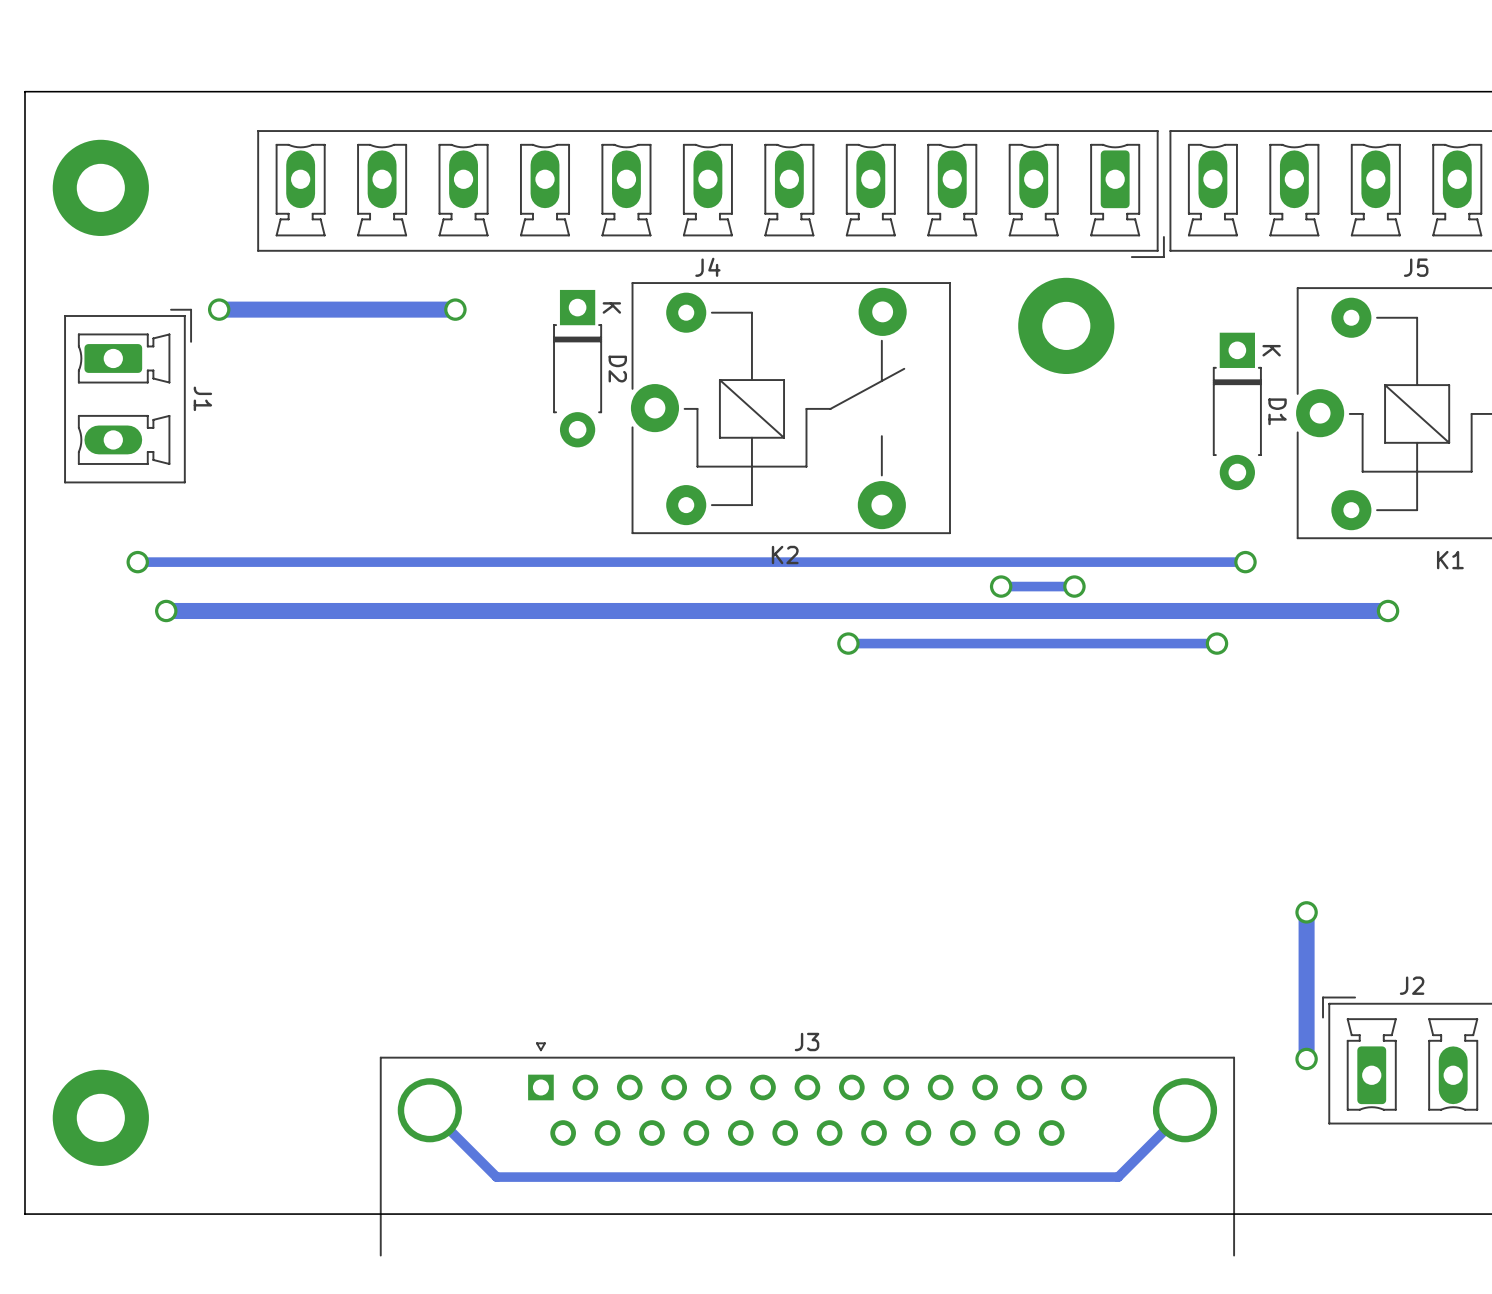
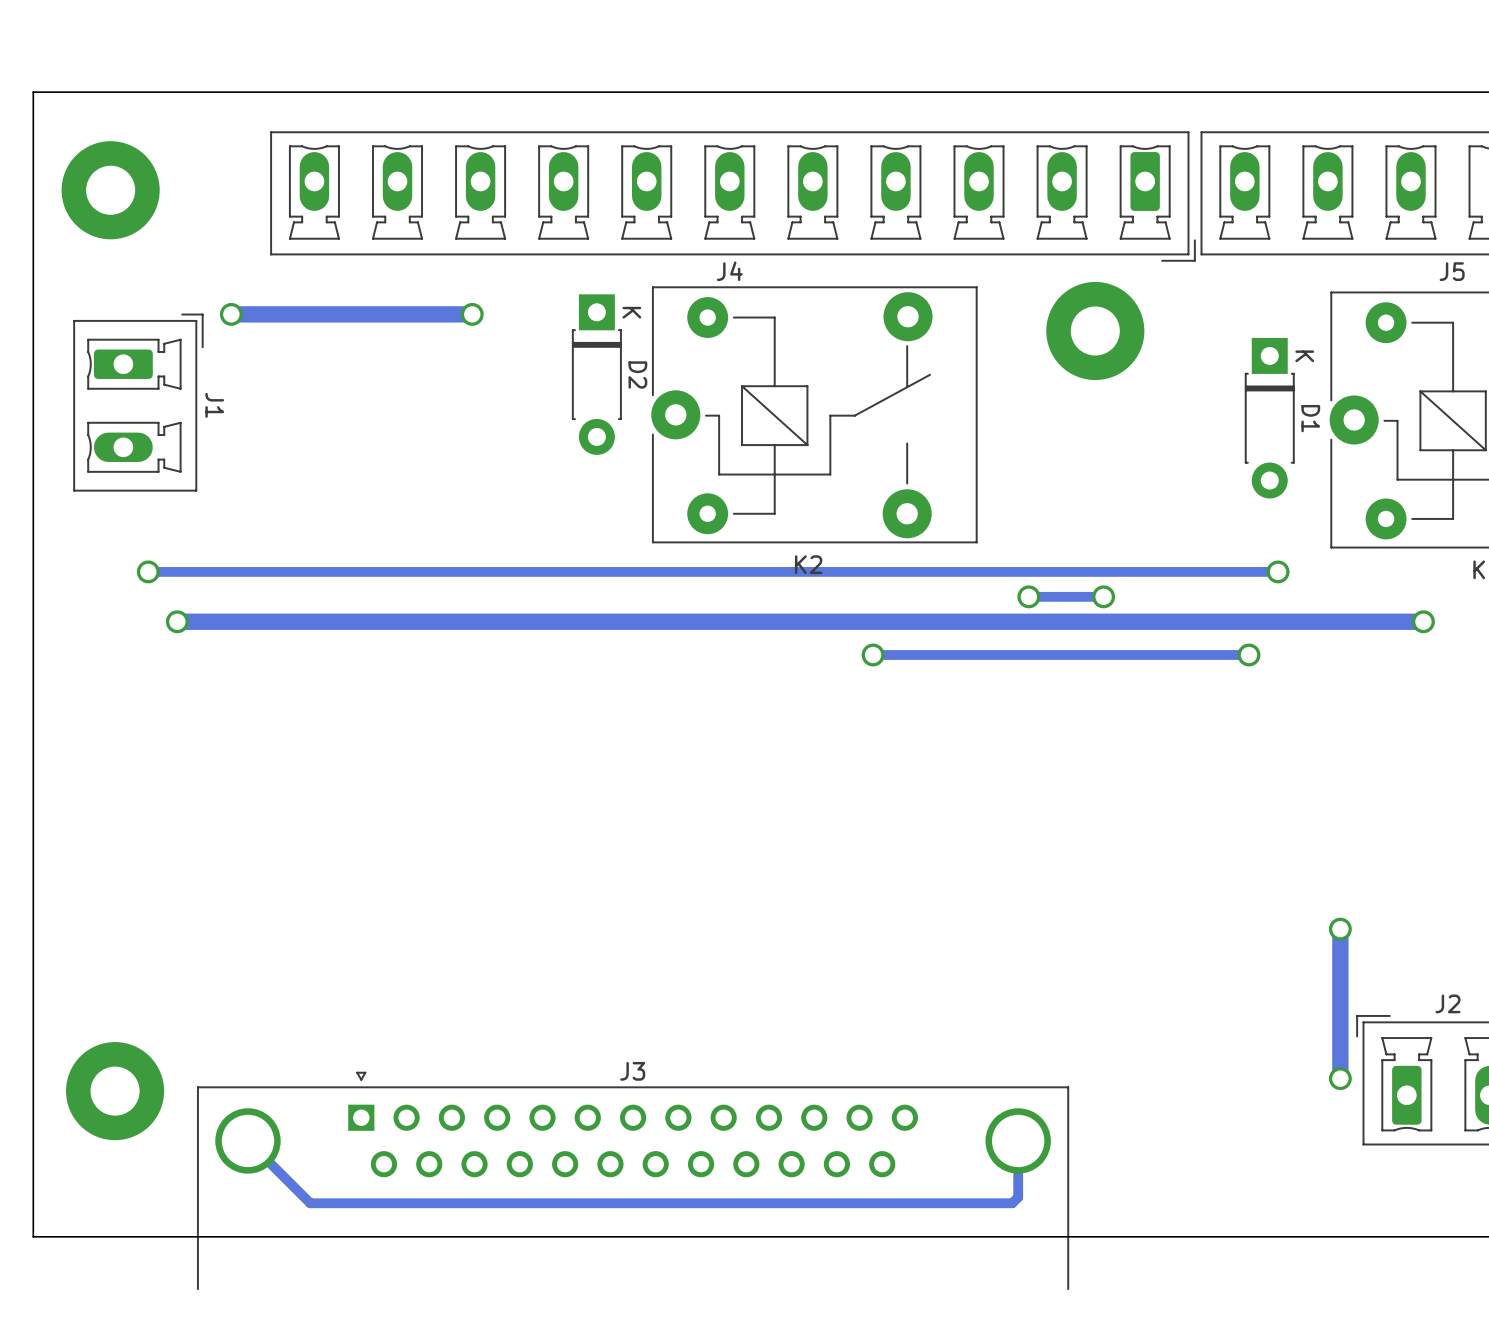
track: (1185, 1110) (1118, 1177) (496, 1177) (429, 1110) -> none
part position: (100, 1117) -> (115, 1091)
track: none -> (1018, 1140) (1018, 1197) (1012, 1203) (310, 1203) (247, 1140)
J3 position: (807, 1149) -> (633, 1180)

